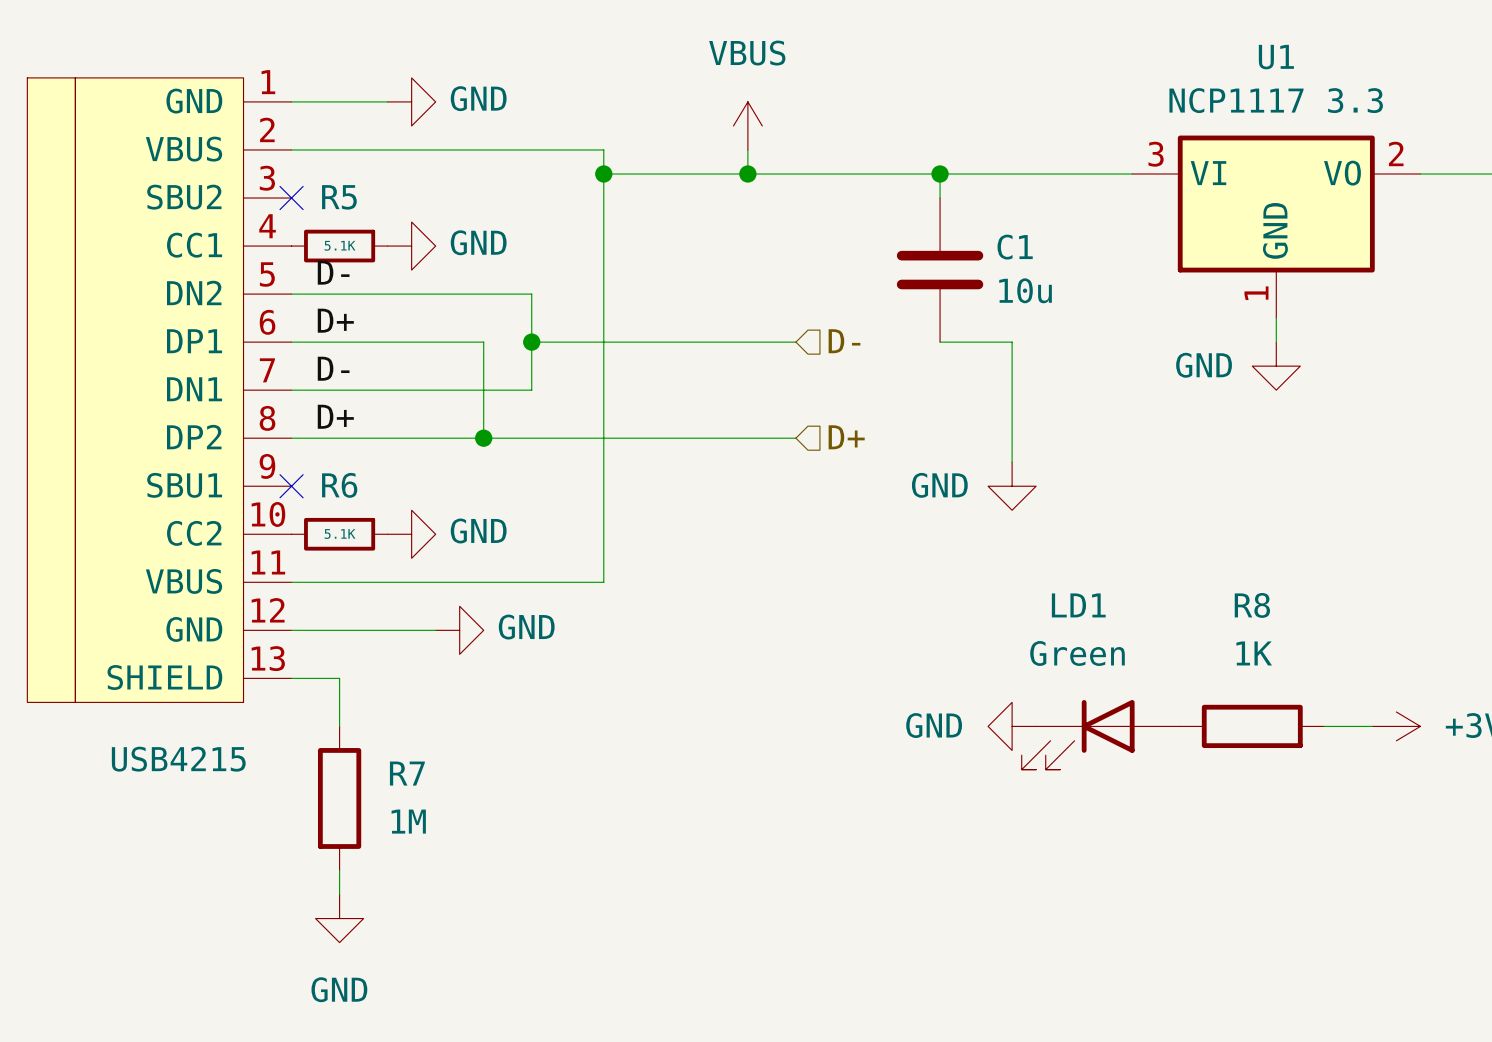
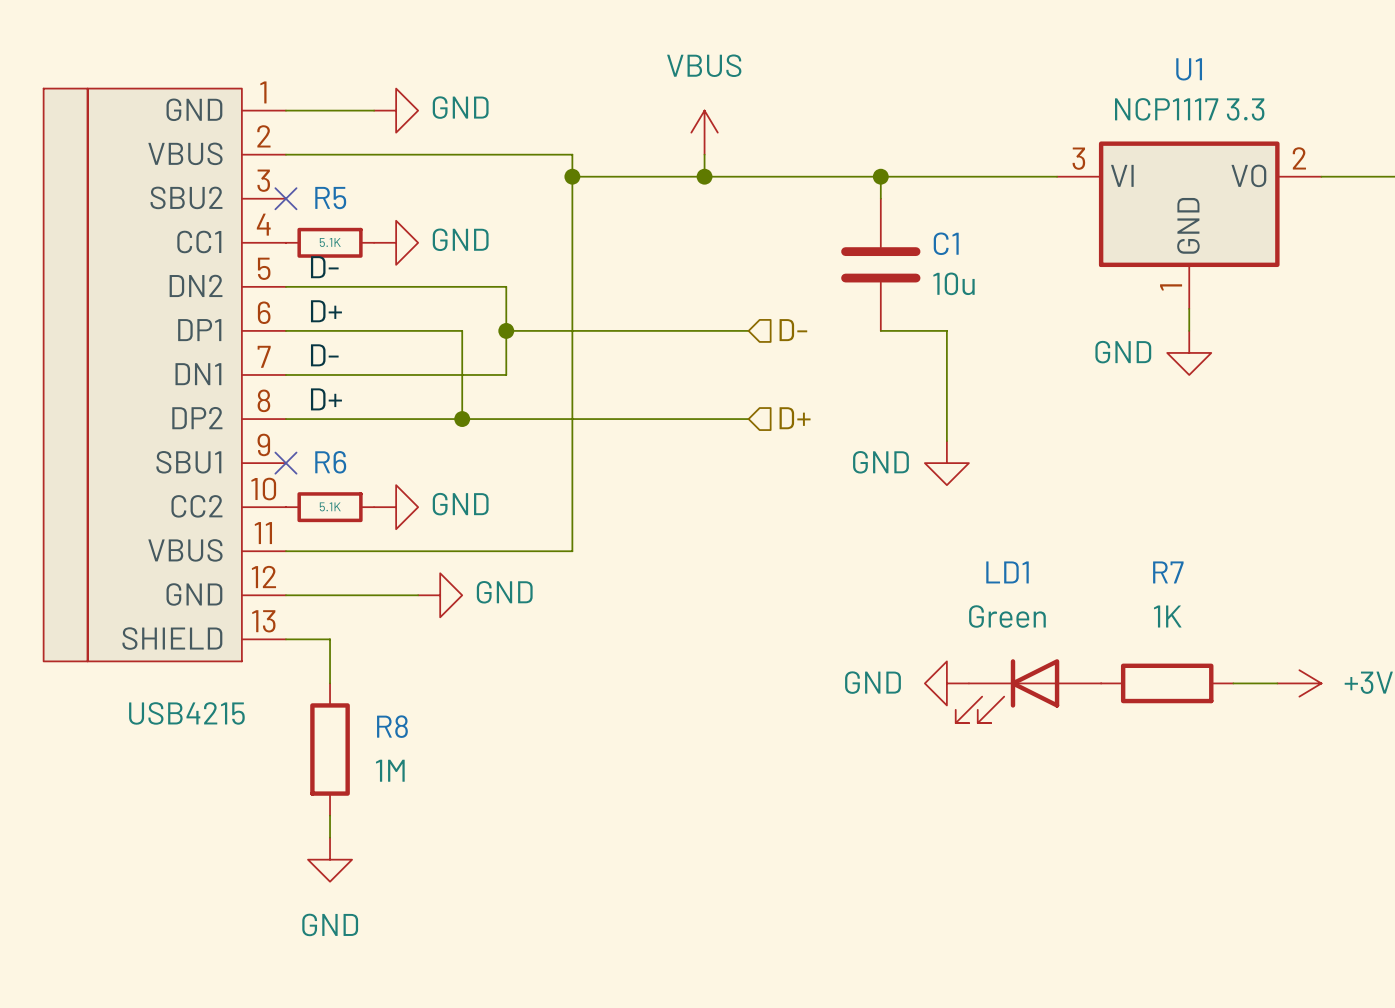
R8 name: R8 (1252, 605) -> R7 (1168, 572)
R7 name: R7 (407, 773) -> R8 (392, 726)

